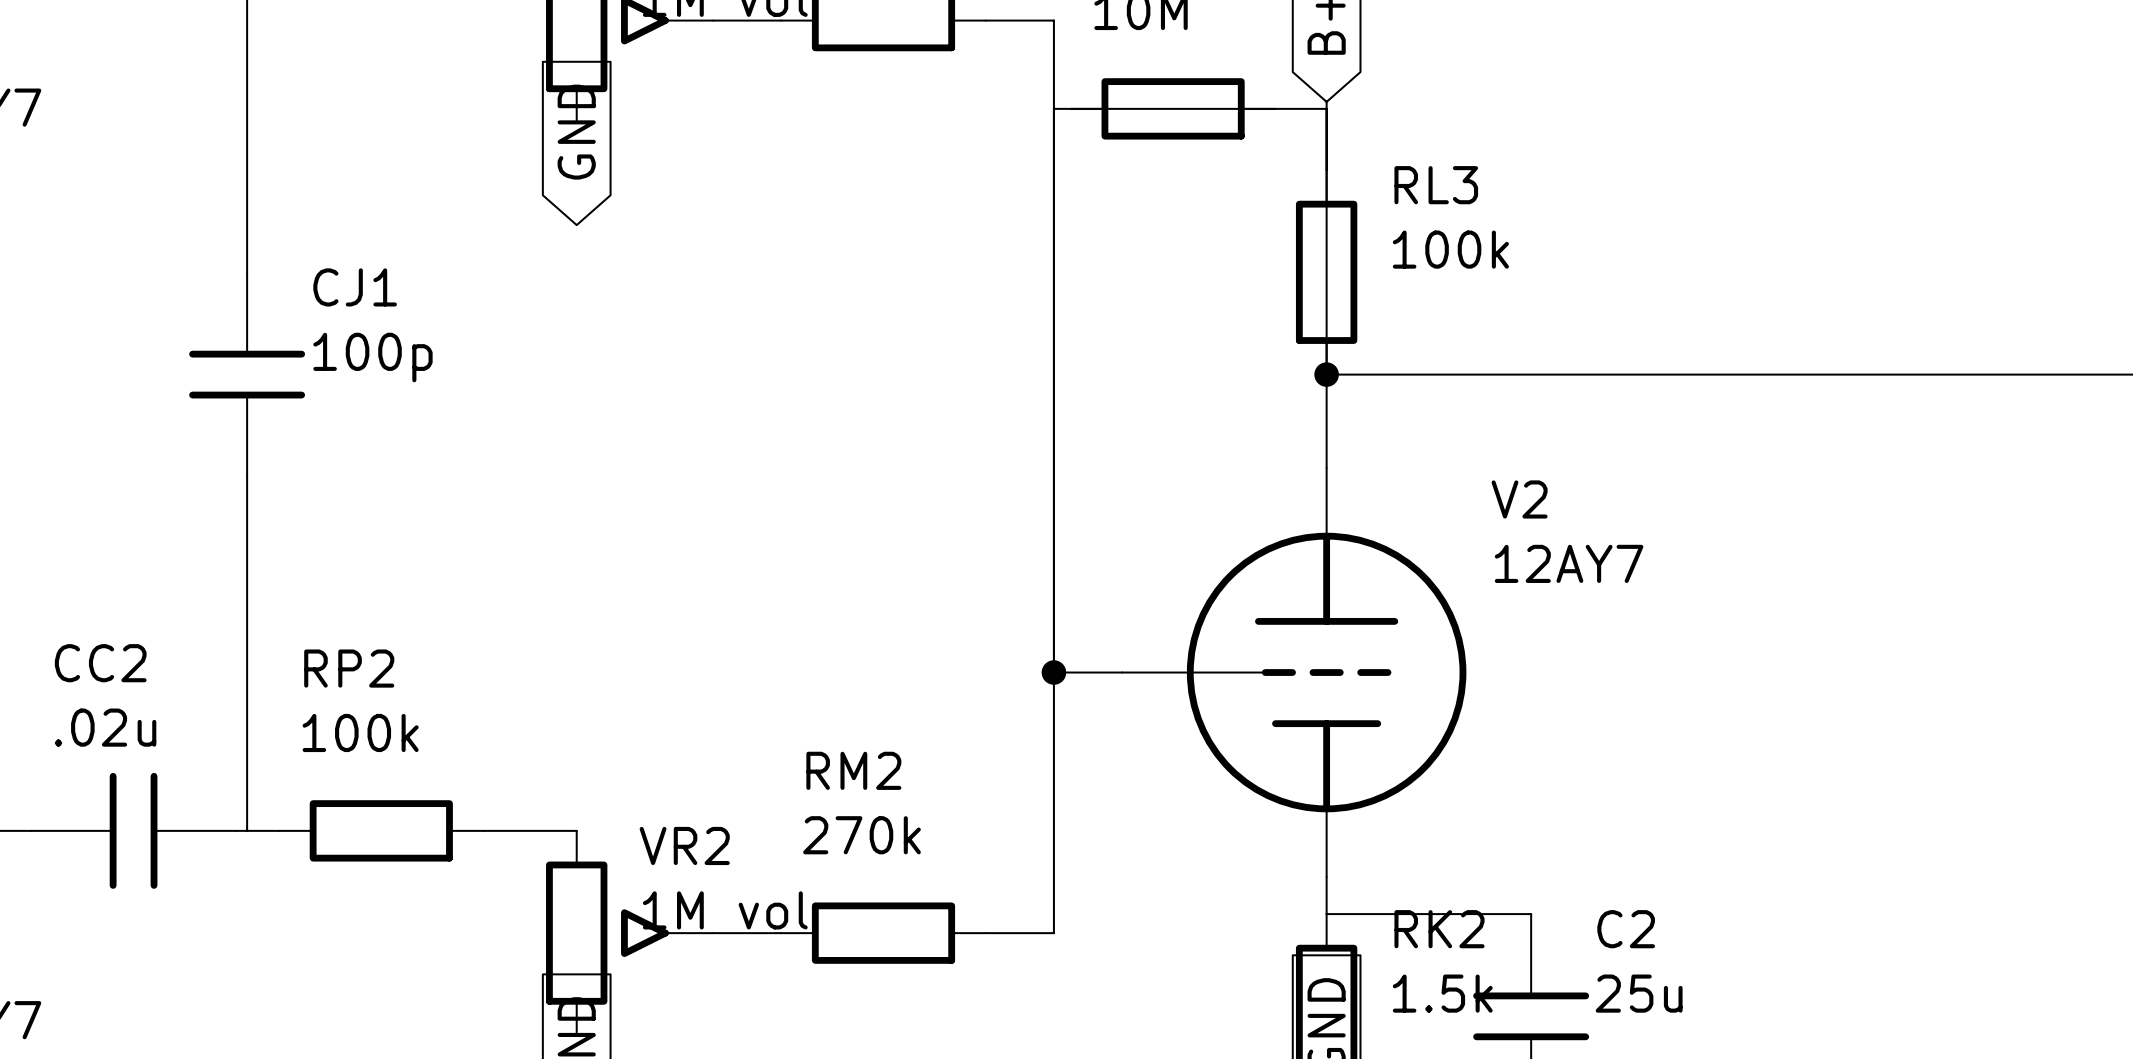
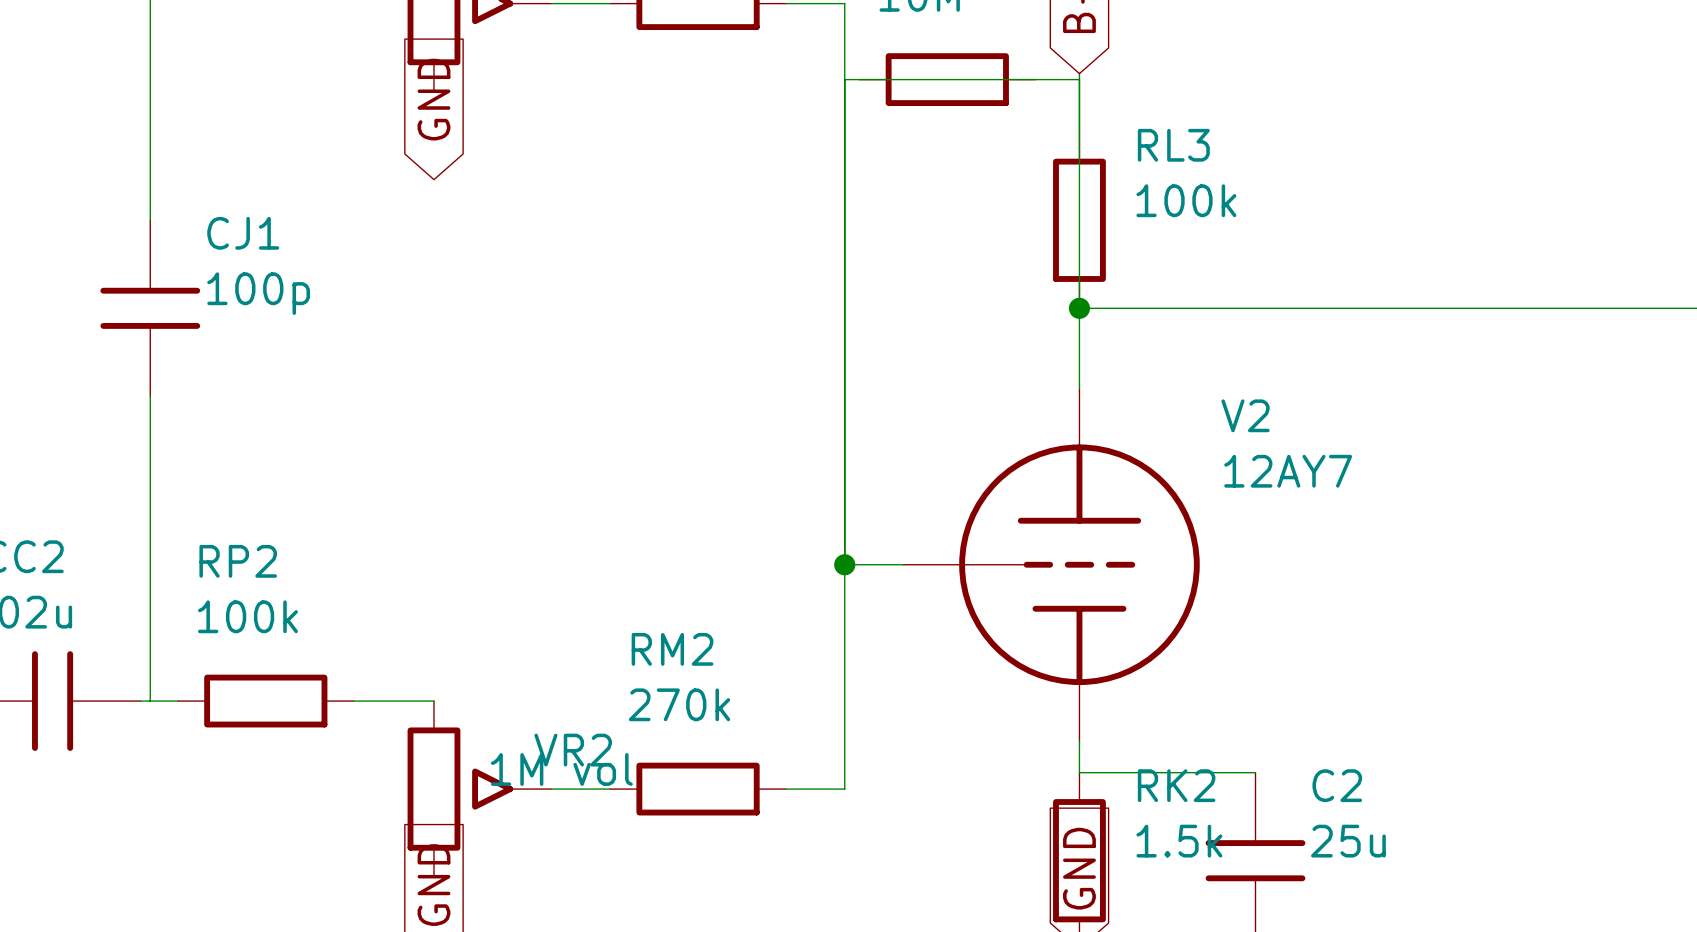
VR2 name position: VR2 (684, 845) -> VR2 (573, 750)

